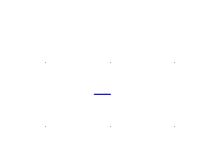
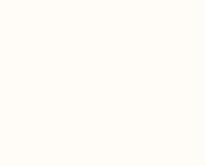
line: (94, 94) (110, 94) -> none

